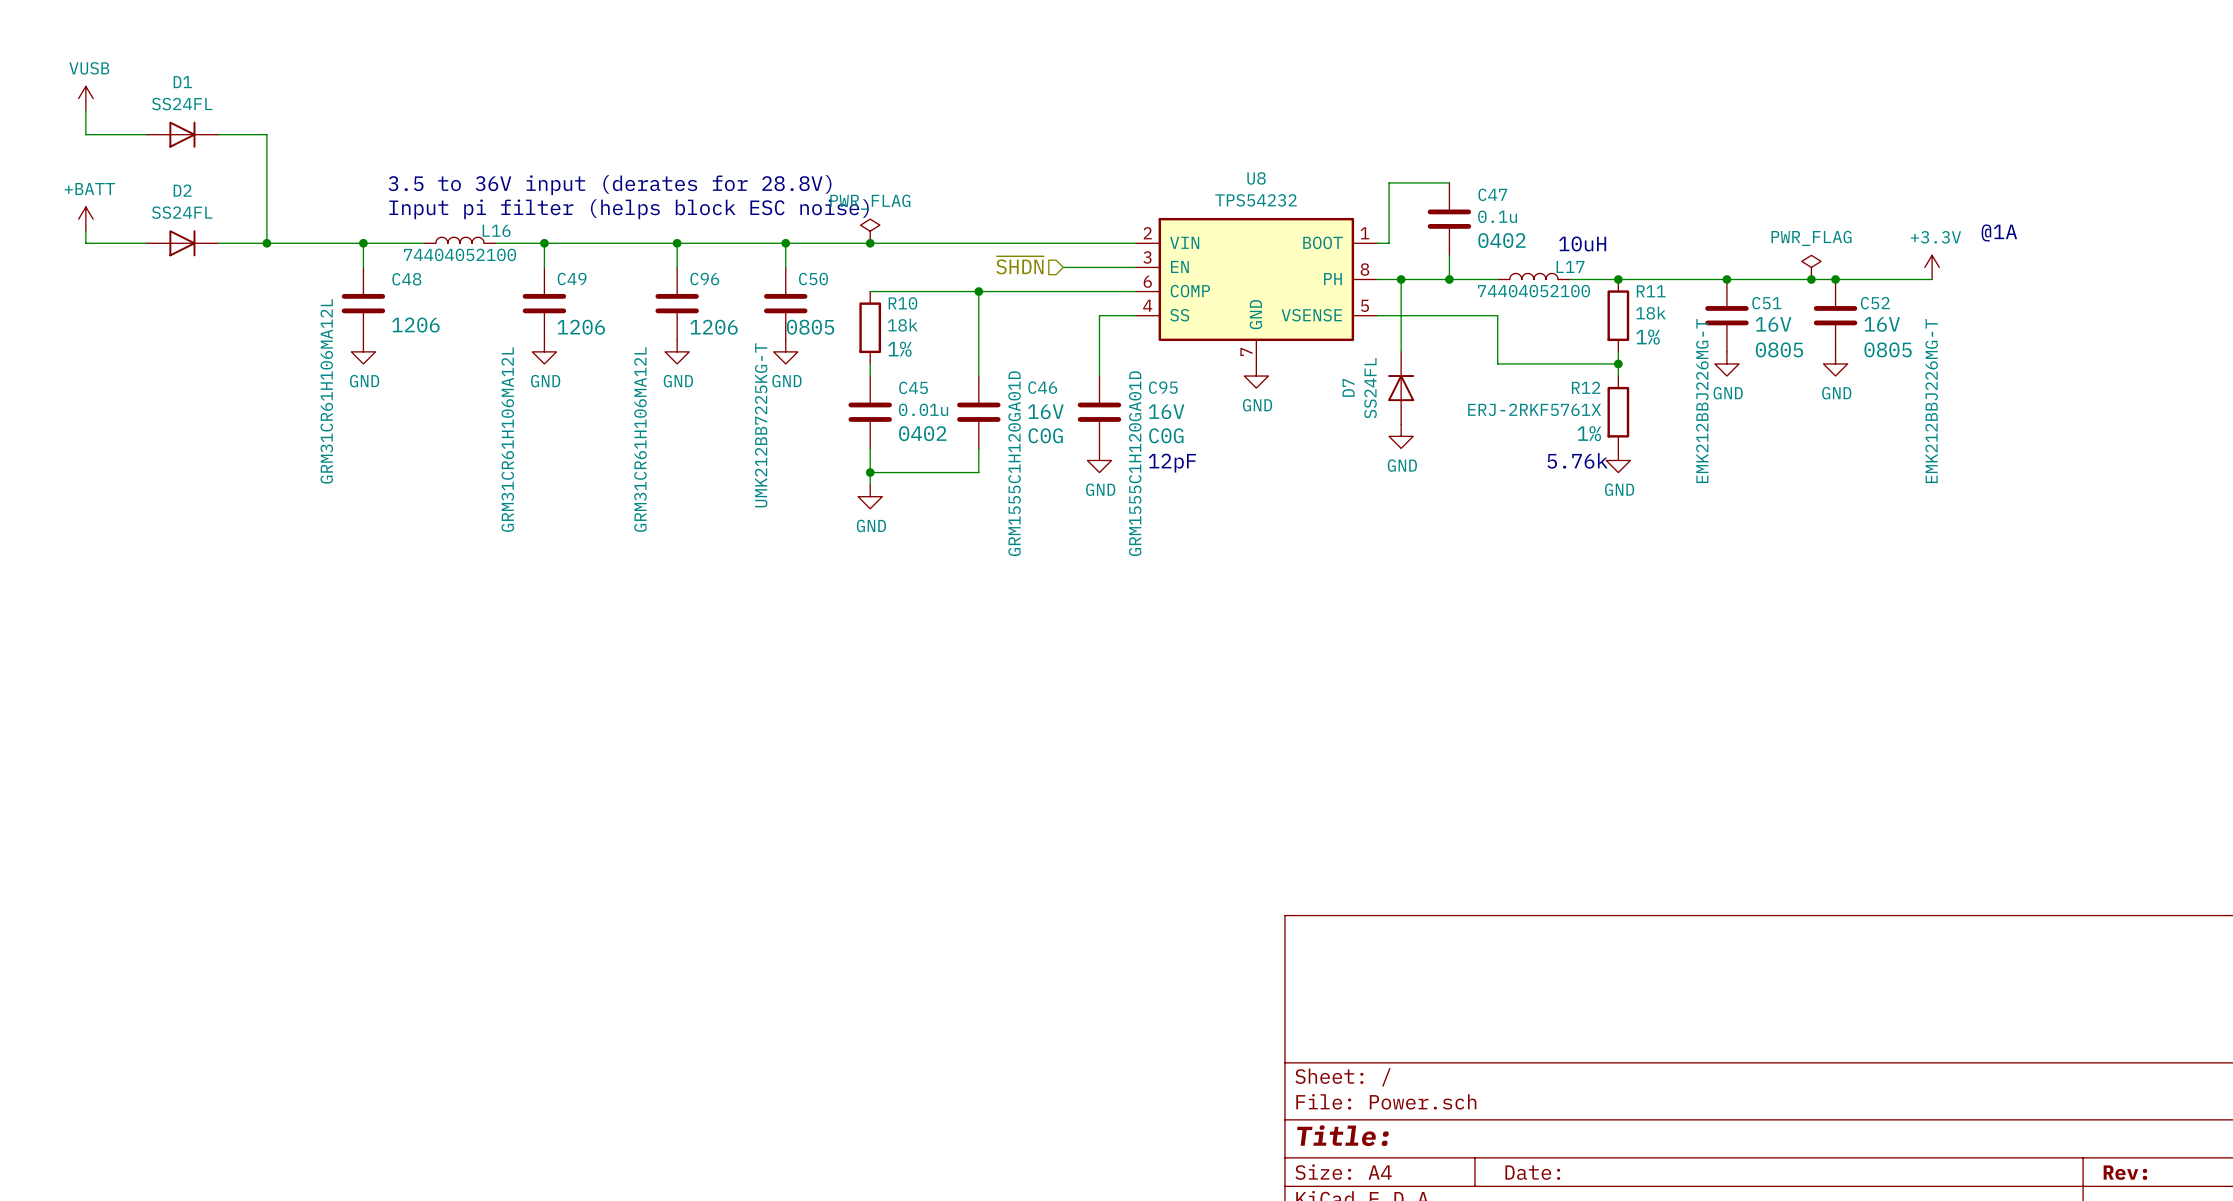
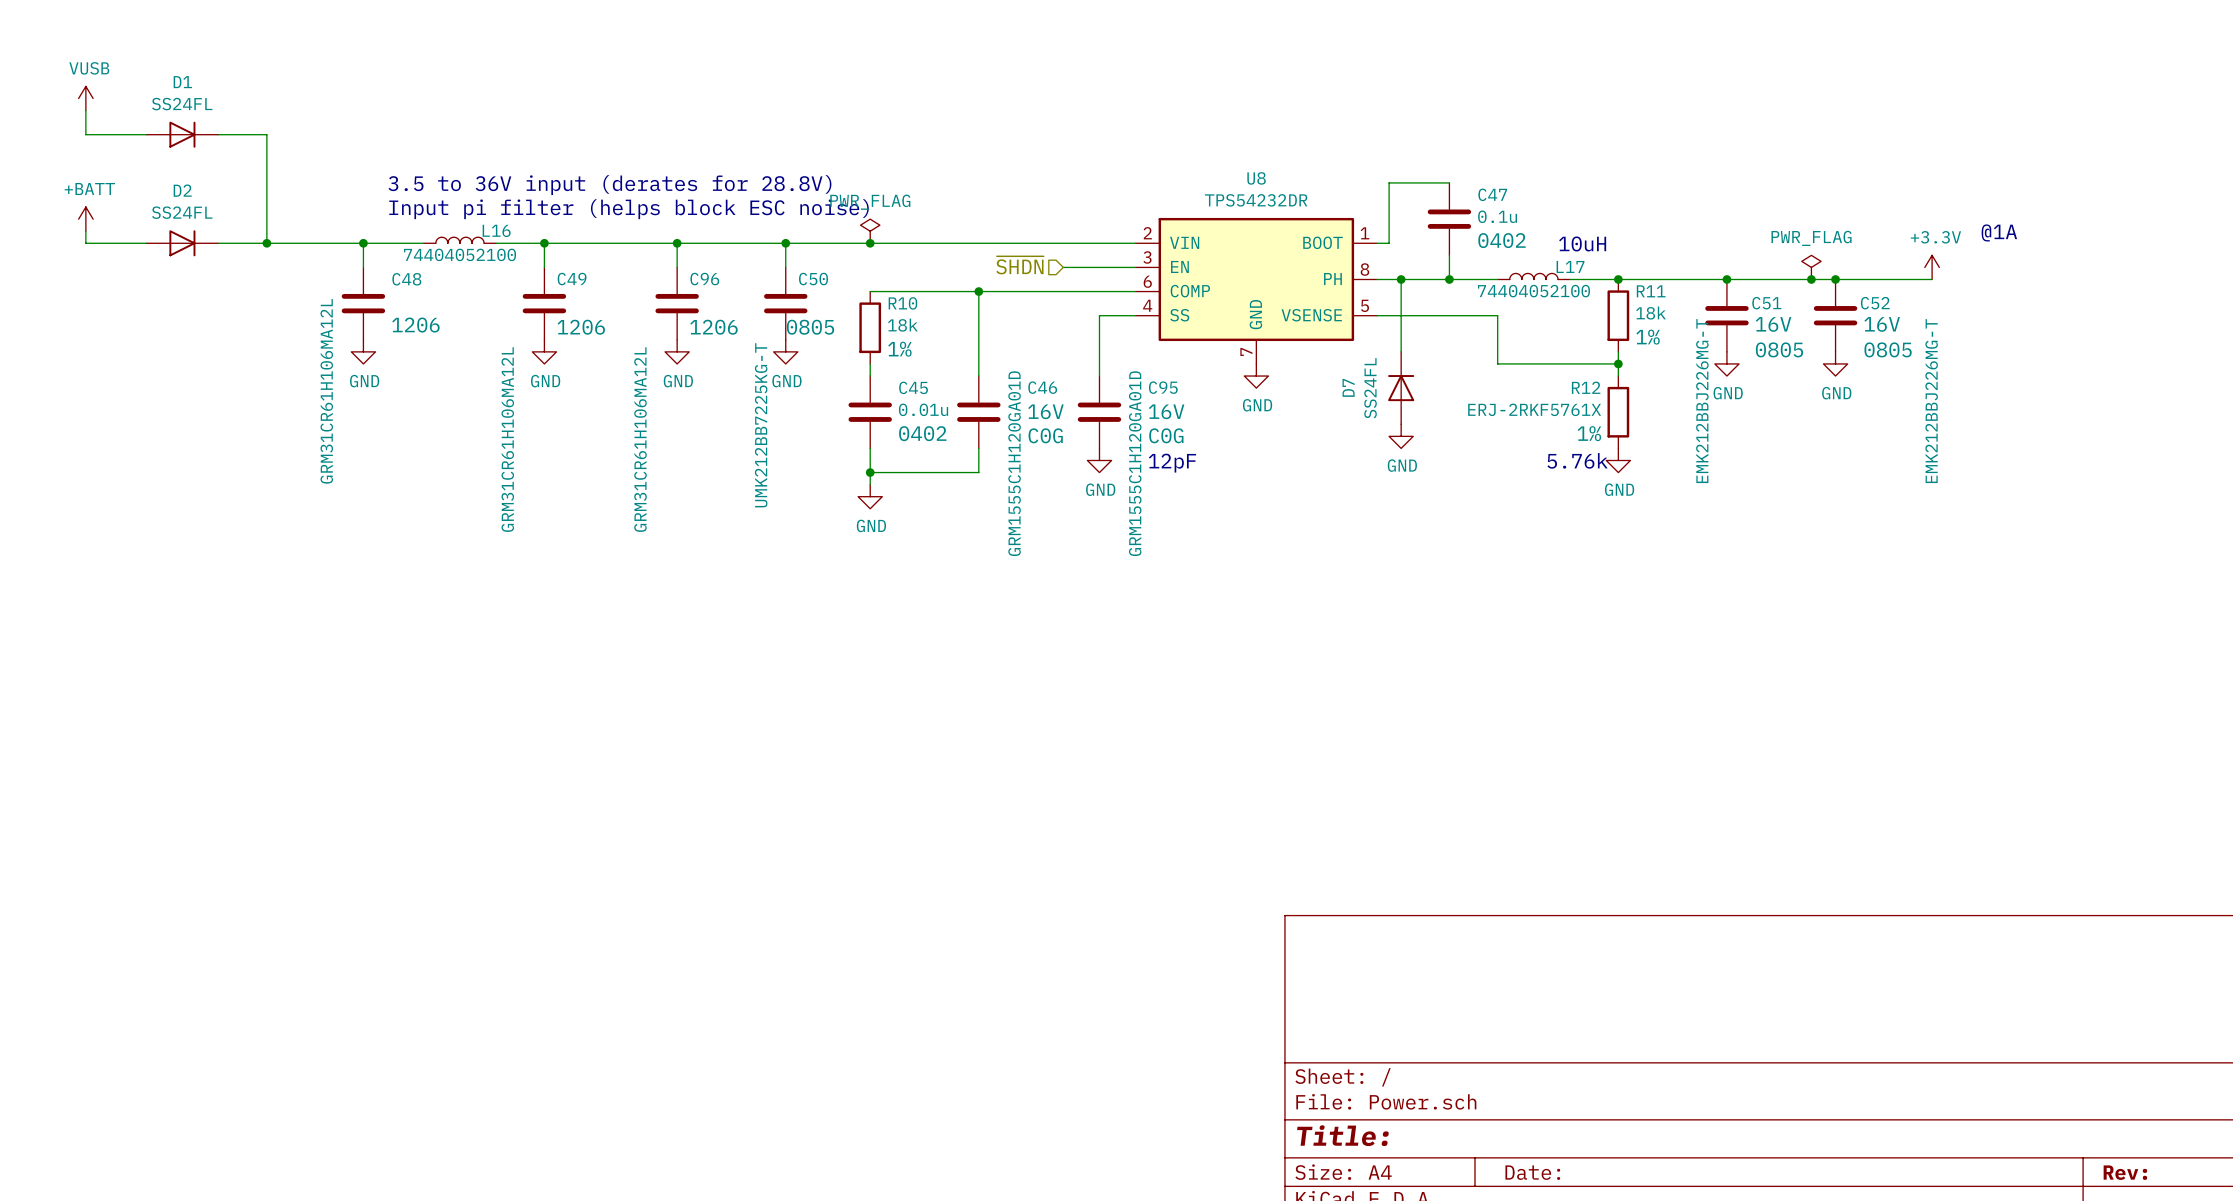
U8 value: TPS54232 (1256, 200) -> TPS54232DR (1256, 200)

